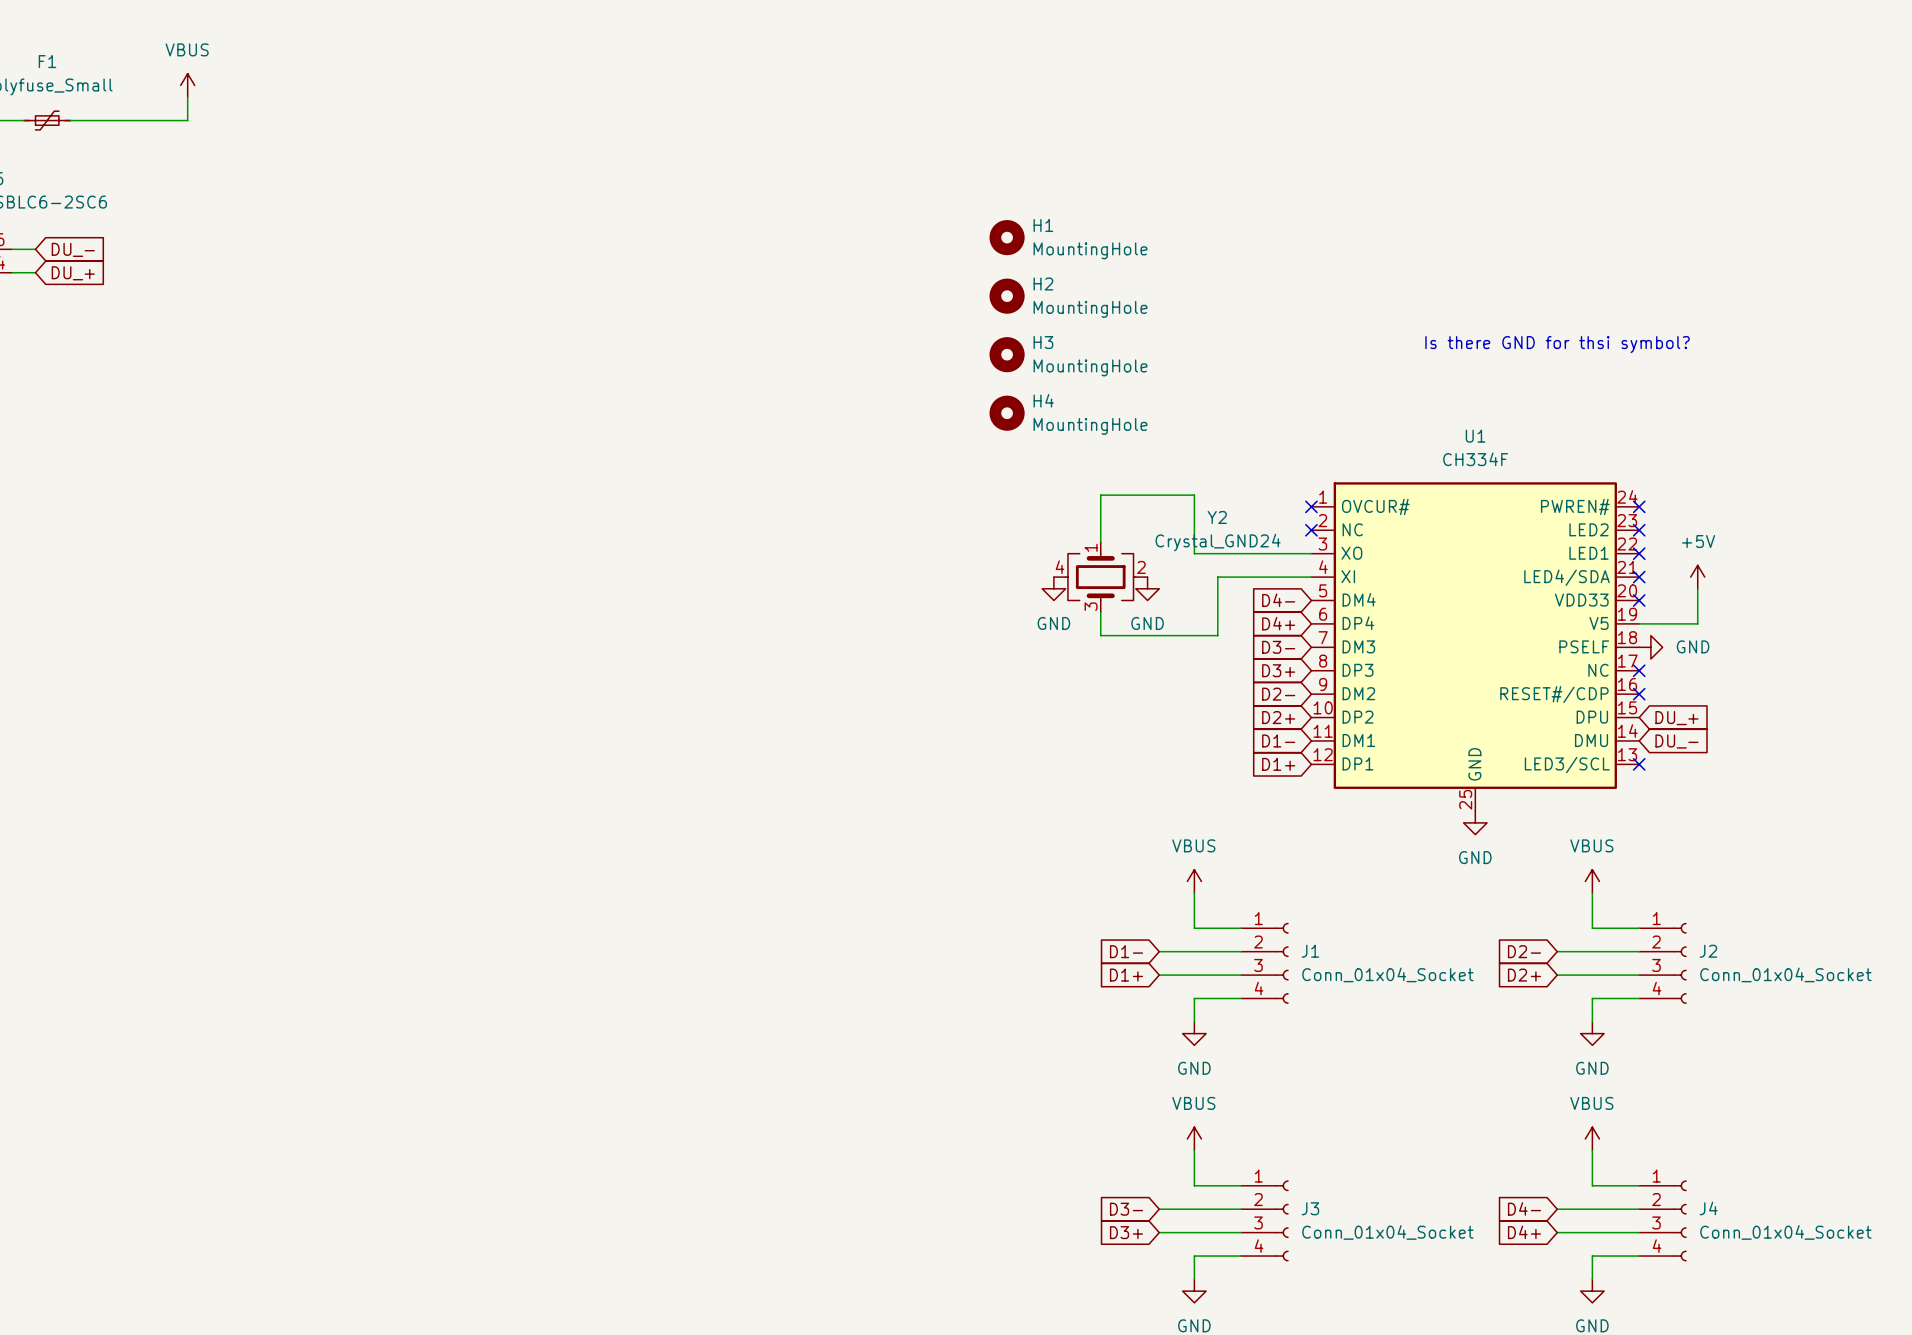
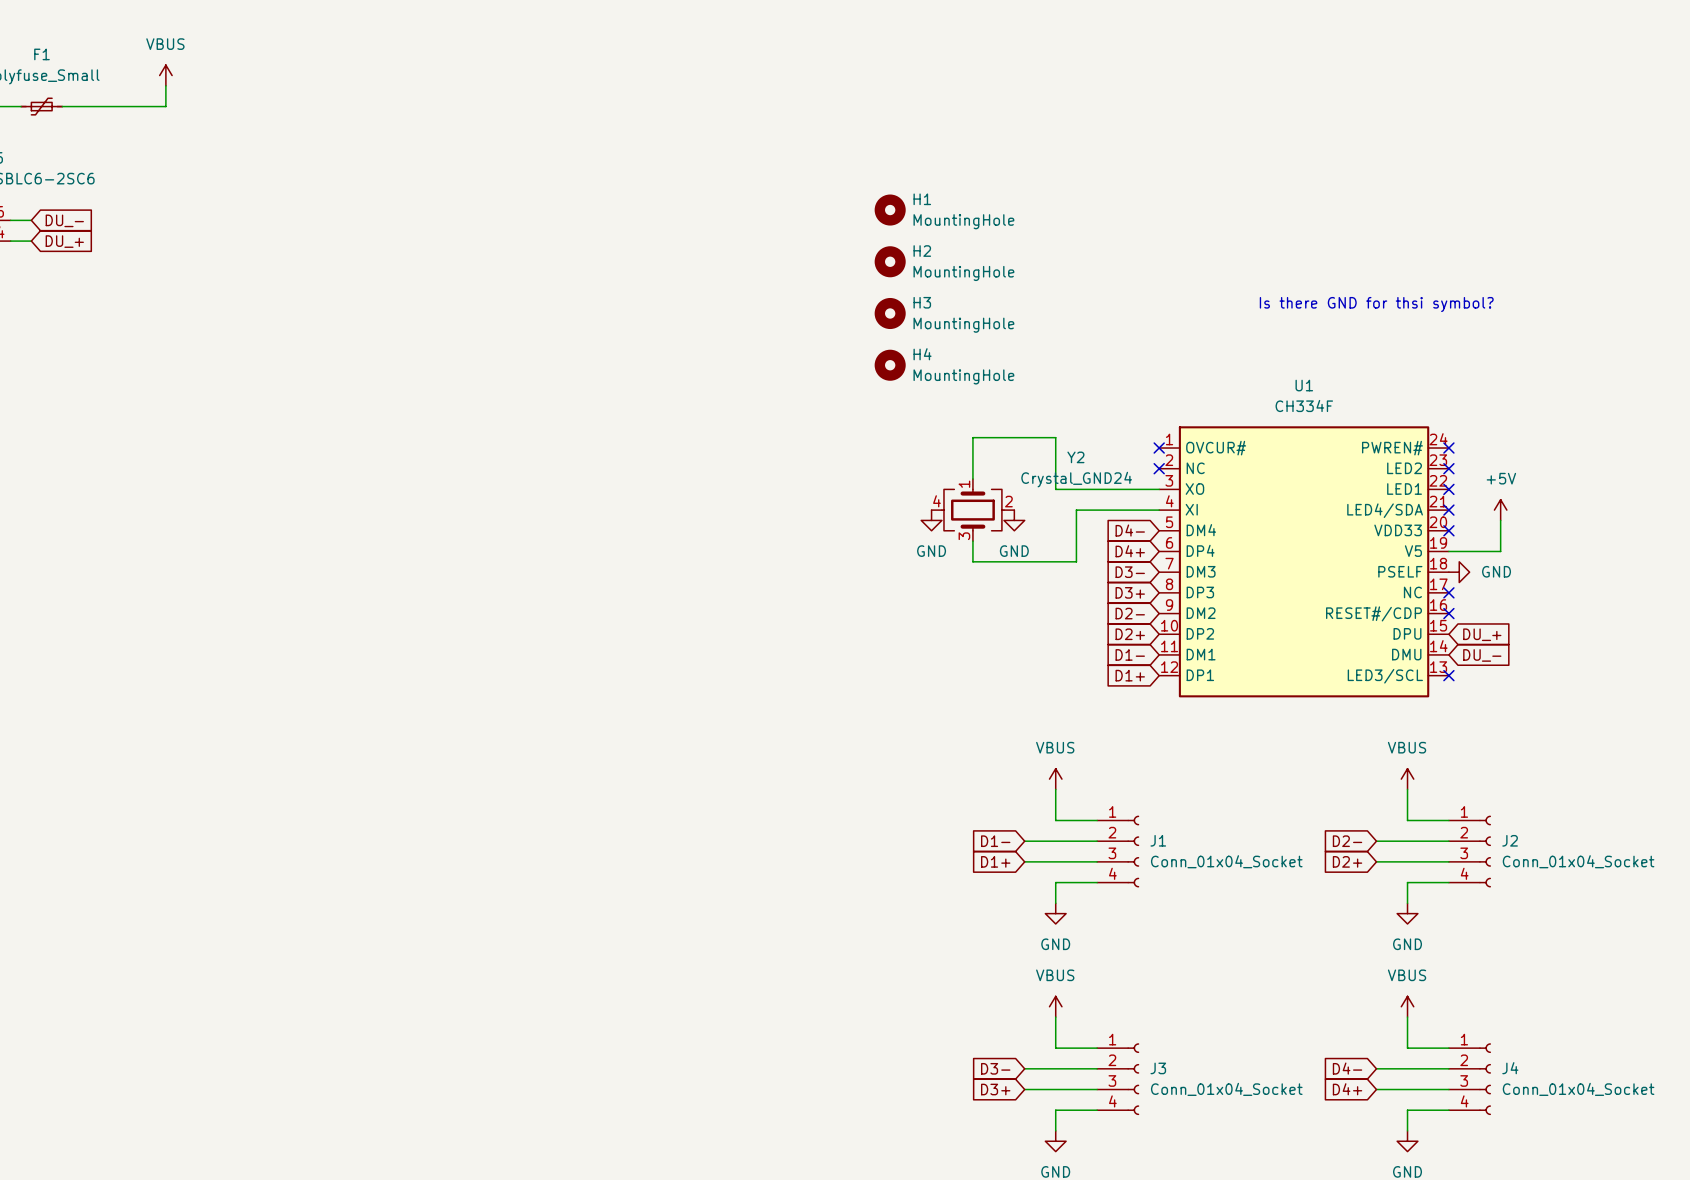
U1 symbol: [1311, 482, 1640, 812] -> [1159, 426, 1449, 698]
power symbol: GND (1475, 822) -> none

